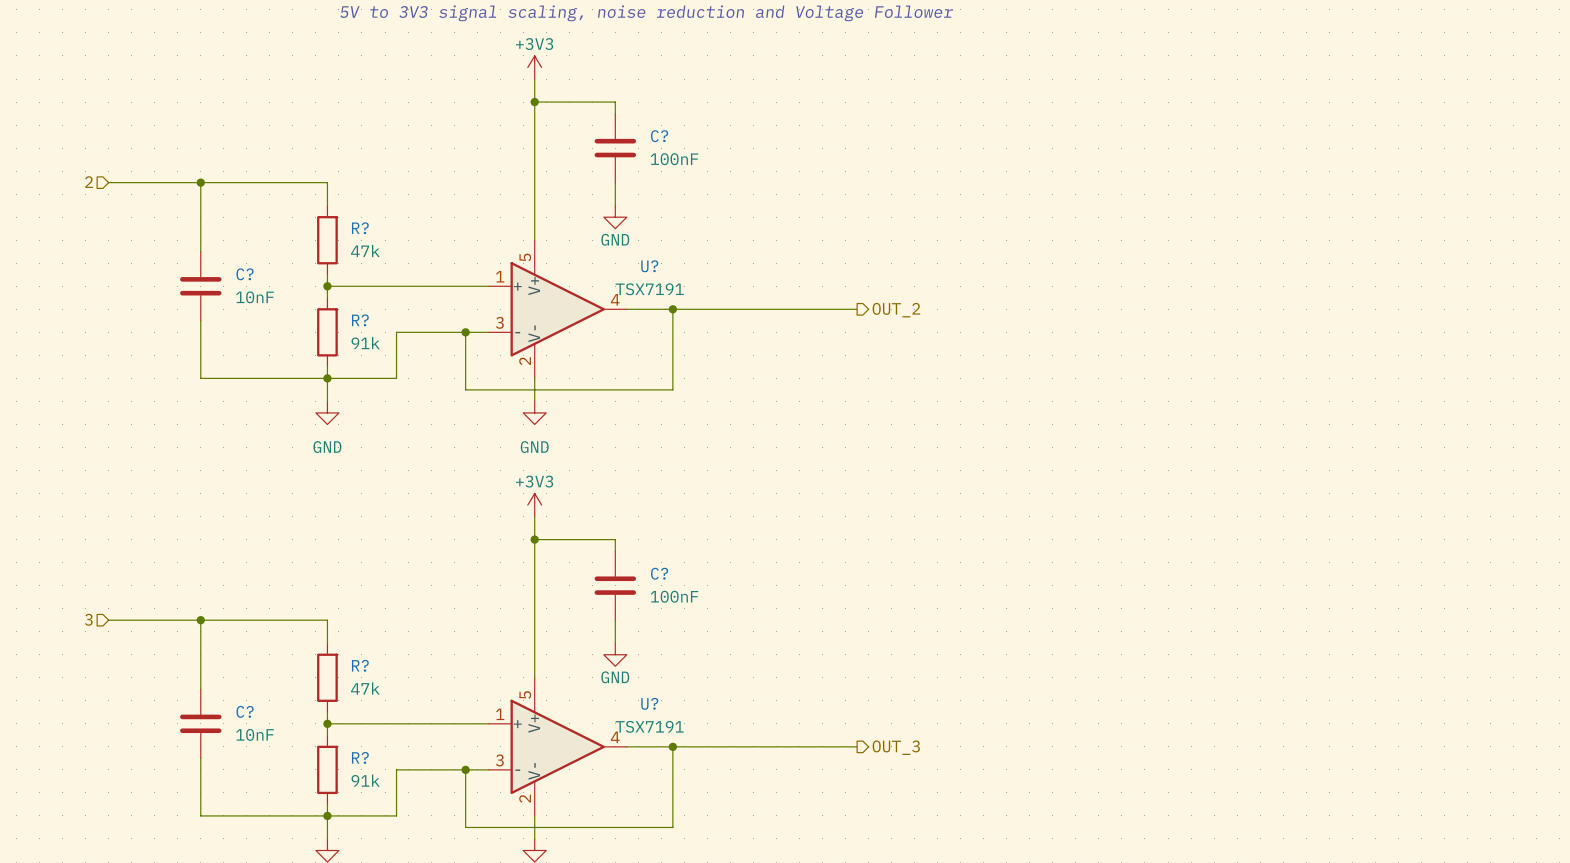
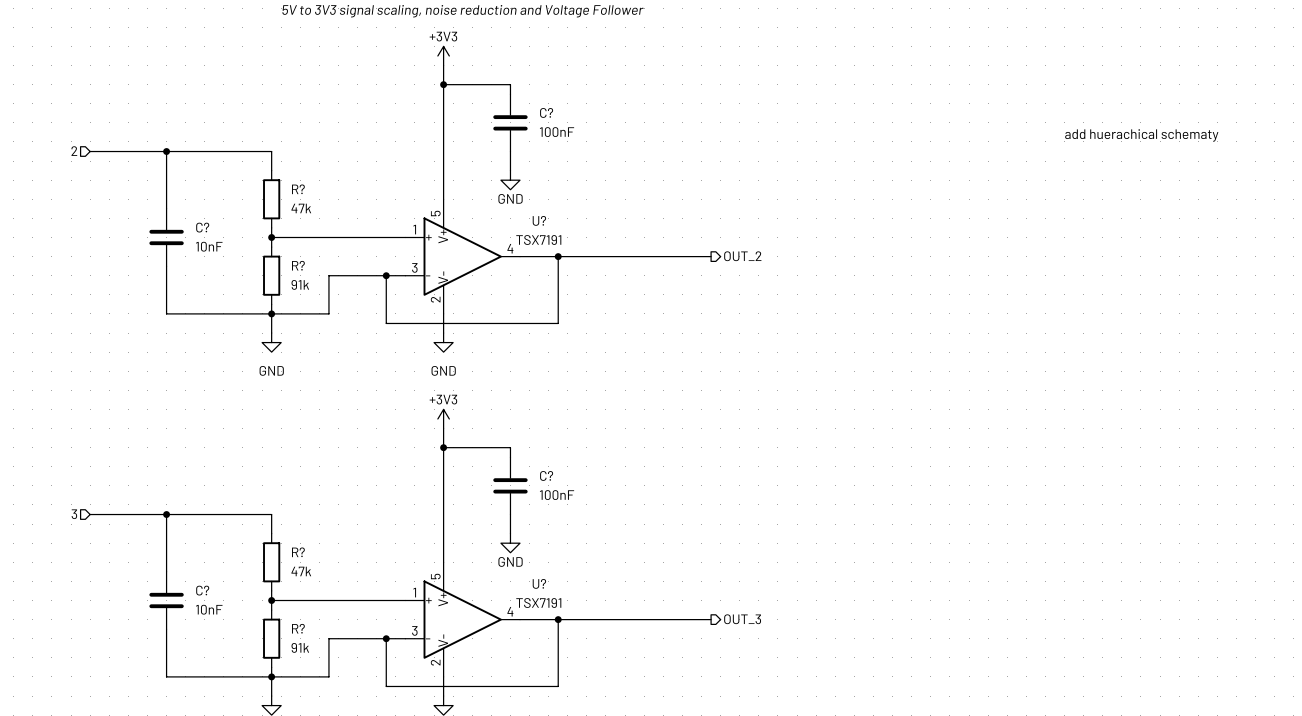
text: none -> add huerachical schematy (1141, 135)

